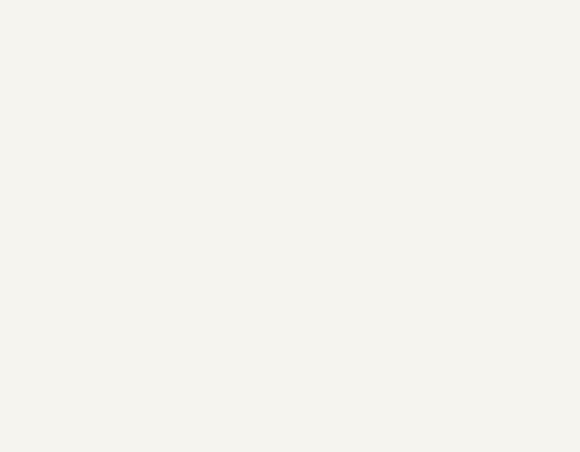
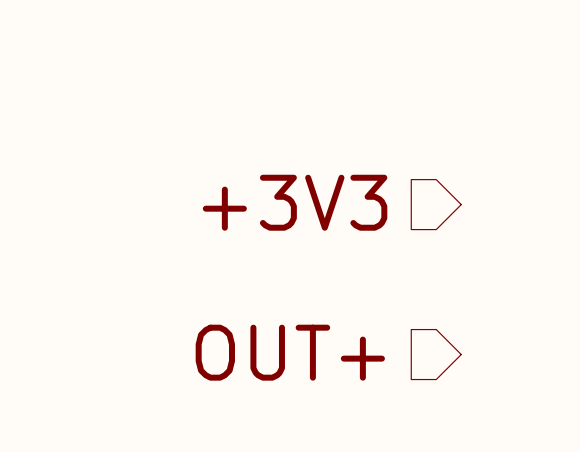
hierarchical label: none -> +3V3 (295, 202)
hierarchical label: none -> OUT+ (290, 352)

